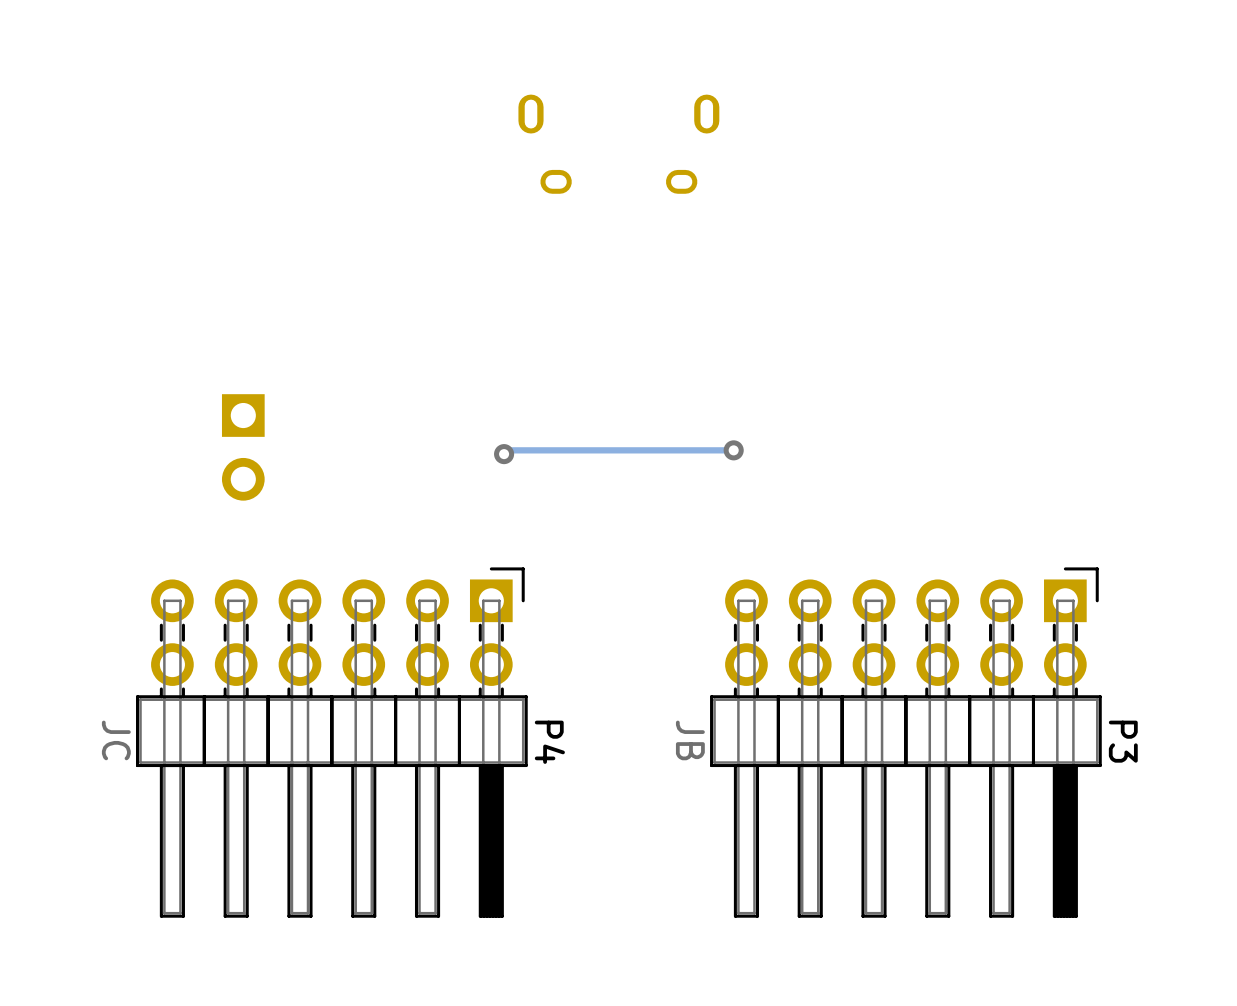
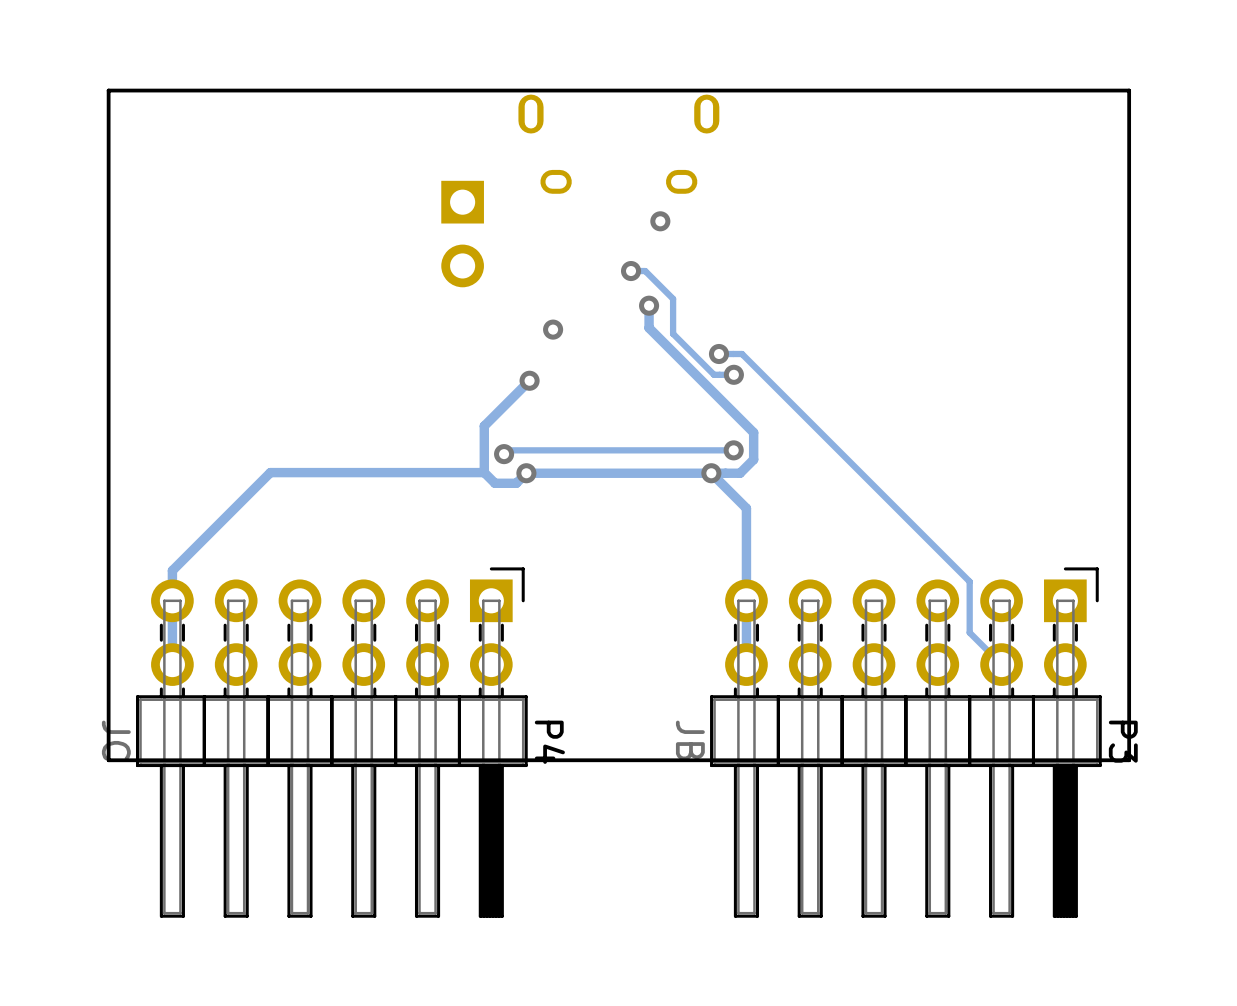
board edge: none -> (1129, 90) (1129, 760) (108, 760) (108, 90) (1129, 90)
via: none -> (660, 221)
track: none -> (631, 271) (645, 271) (673, 298) (673, 333) (714, 374) (733, 374)
via: none -> (631, 271)
track: none -> (649, 305) (649, 328) (753, 432) (753, 459) (740, 473) (526, 473) (516, 483) (494, 483) (484, 472)
via: none -> (649, 305)
via: none -> (553, 329)
track: none -> (718, 354) (742, 354) (969, 581) (969, 632) (1001, 664)
via: none -> (718, 354)
via: none -> (733, 374)
track: none -> (529, 380) (484, 426) (484, 472)
via: none -> (529, 380)
part position: (243, 447) -> (462, 234)
track: none -> (484, 472) (270, 472) (172, 570) (172, 664)
via: none -> (526, 473)
track: none -> (711, 473) (746, 508) (746, 664)
via: none -> (711, 473)

